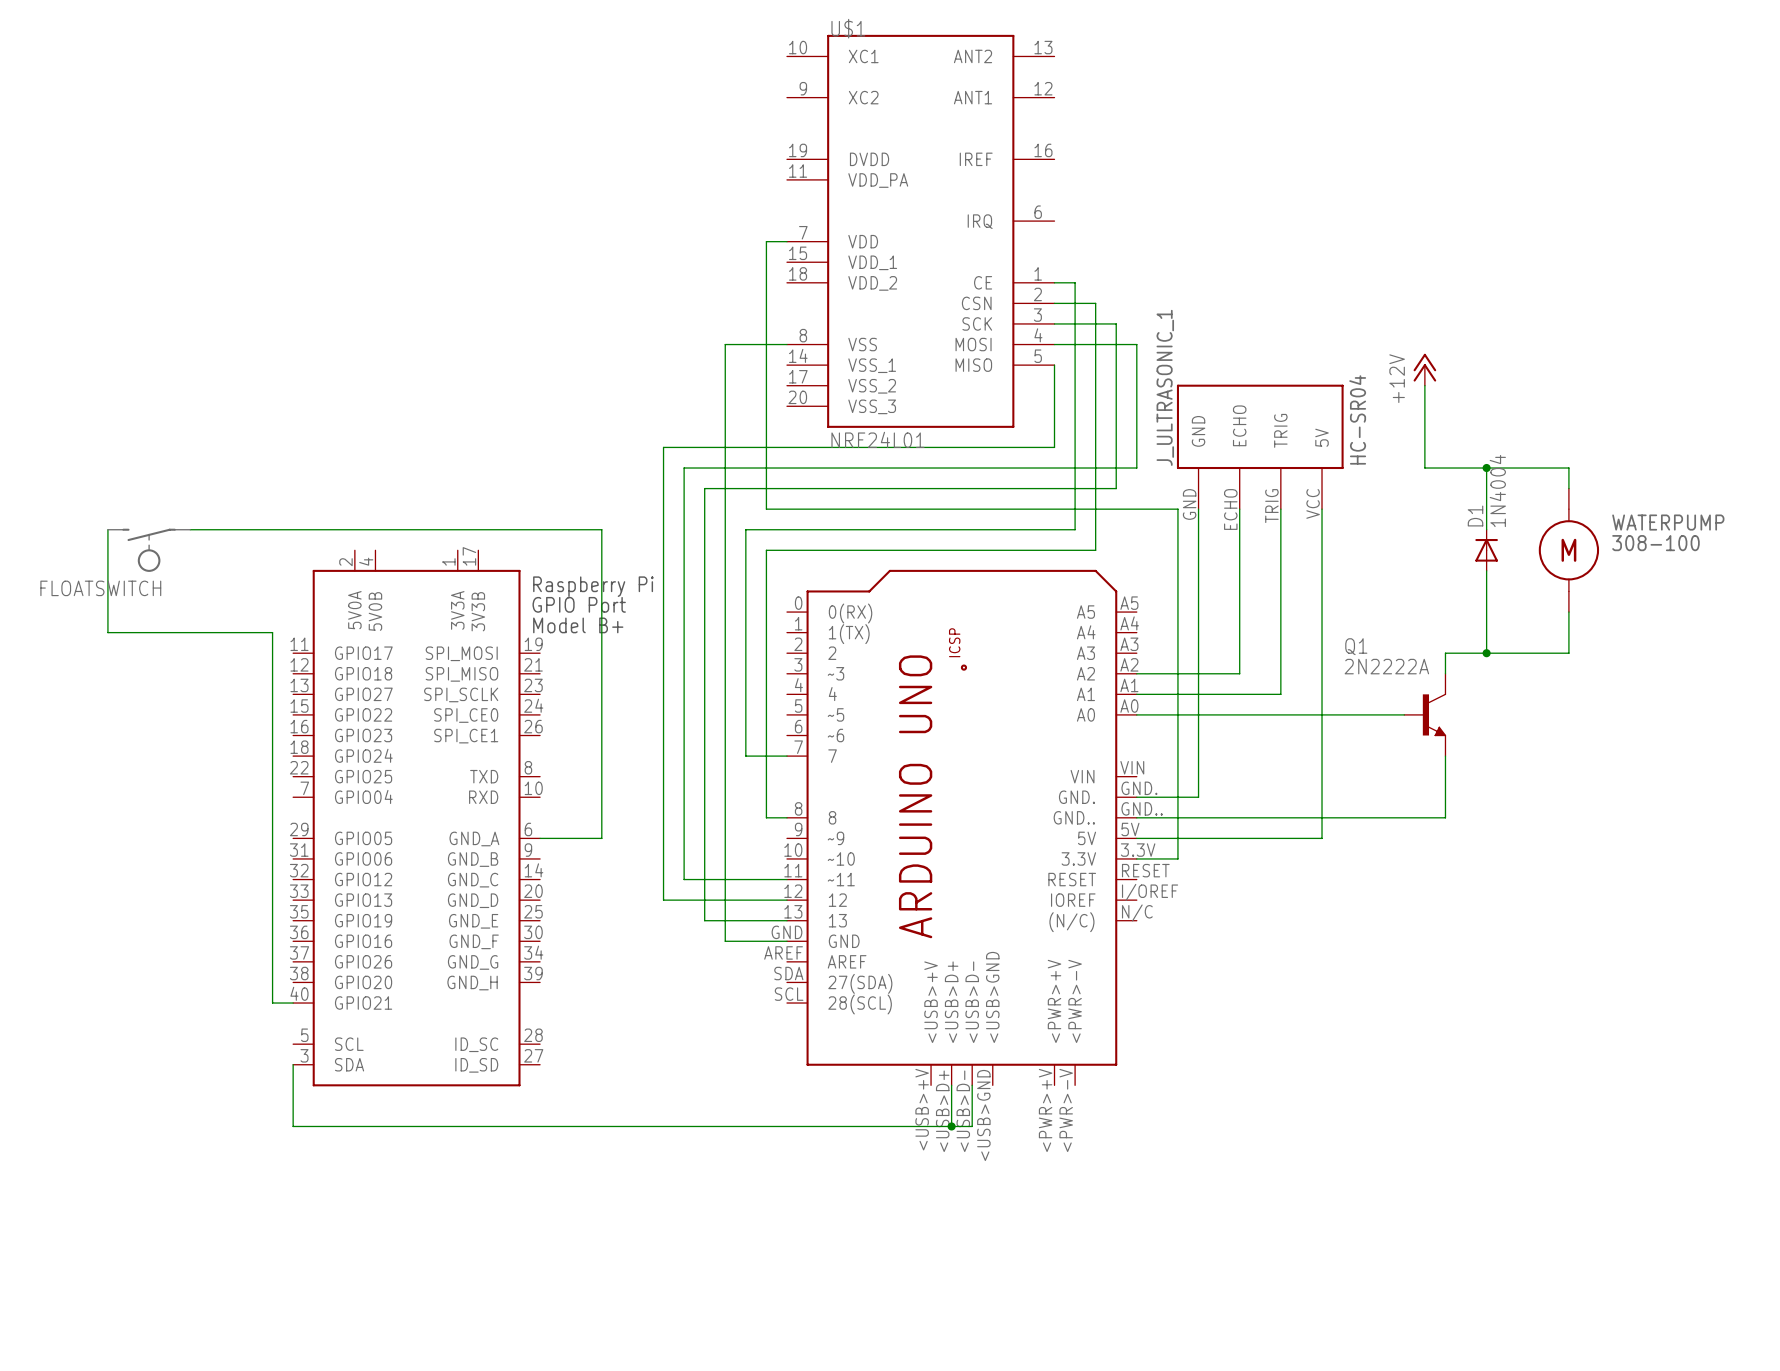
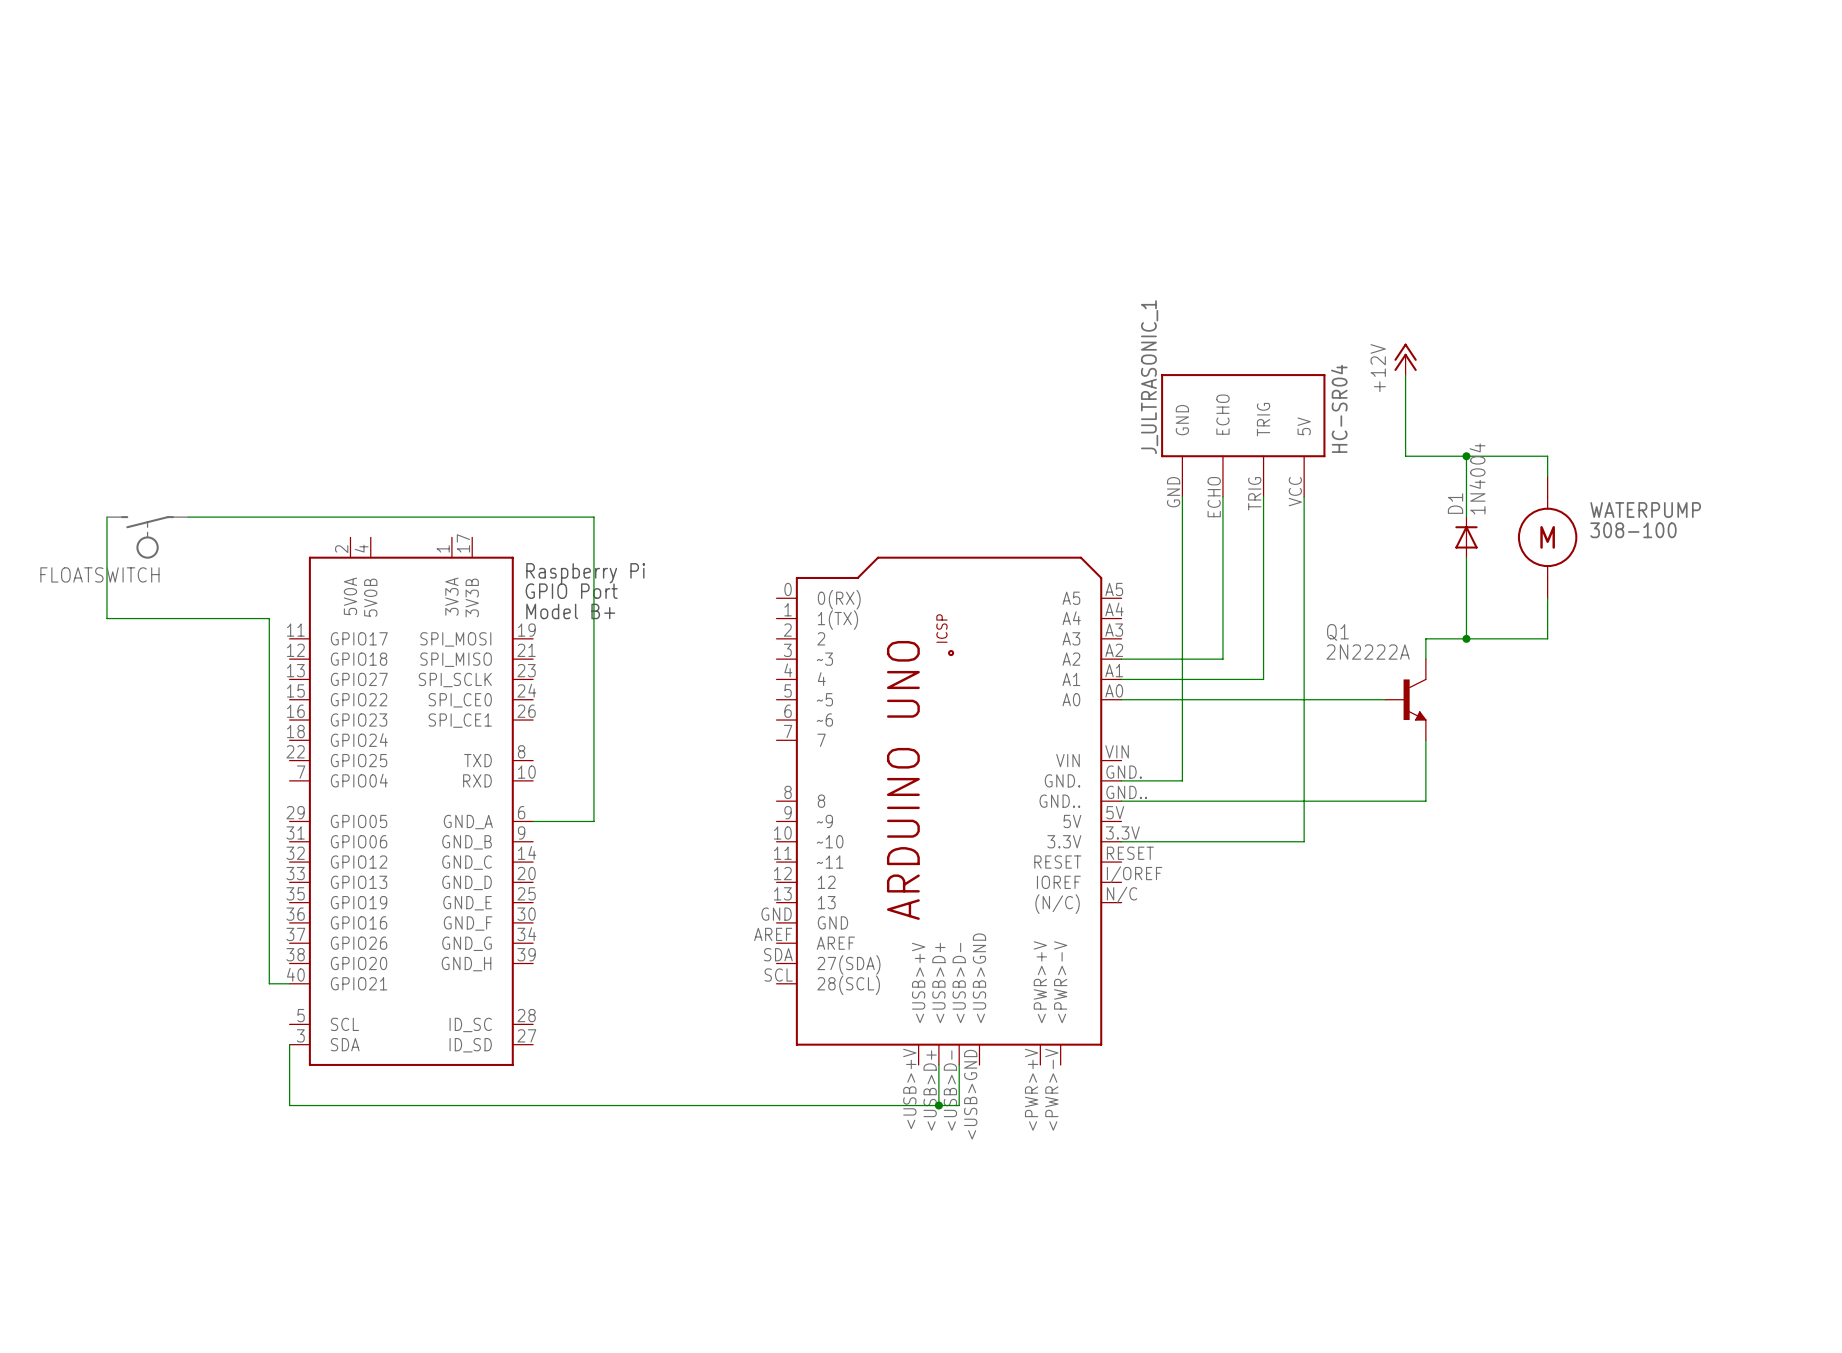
U$1: NRF24L01 (920, 231) -> none
wire: (787, 241) (766, 241) (766, 509) (1177, 509) (1177, 858) -> none
wire: (1054, 282) (1075, 282) (1075, 529) (745, 529) (745, 756) (787, 756) -> none
wire: (1054, 303) (1095, 303) (1095, 550) (766, 550) (766, 817) (787, 817) -> none
wire: (1054, 323) (1116, 323) (1116, 488) (704, 488) (704, 920) (787, 920) -> none
wire: (787, 344) (725, 344) (725, 941) (787, 941) -> none
wire: (1054, 344) (1136, 344) (1136, 468) (684, 468) (684, 879) (787, 879) -> none
wire: (1054, 365) (1054, 447) (663, 447) (663, 900) (787, 900) -> none
wire: (1136, 838) (1322, 838) -> (1162, 841) (1304, 841) (1304, 821)

